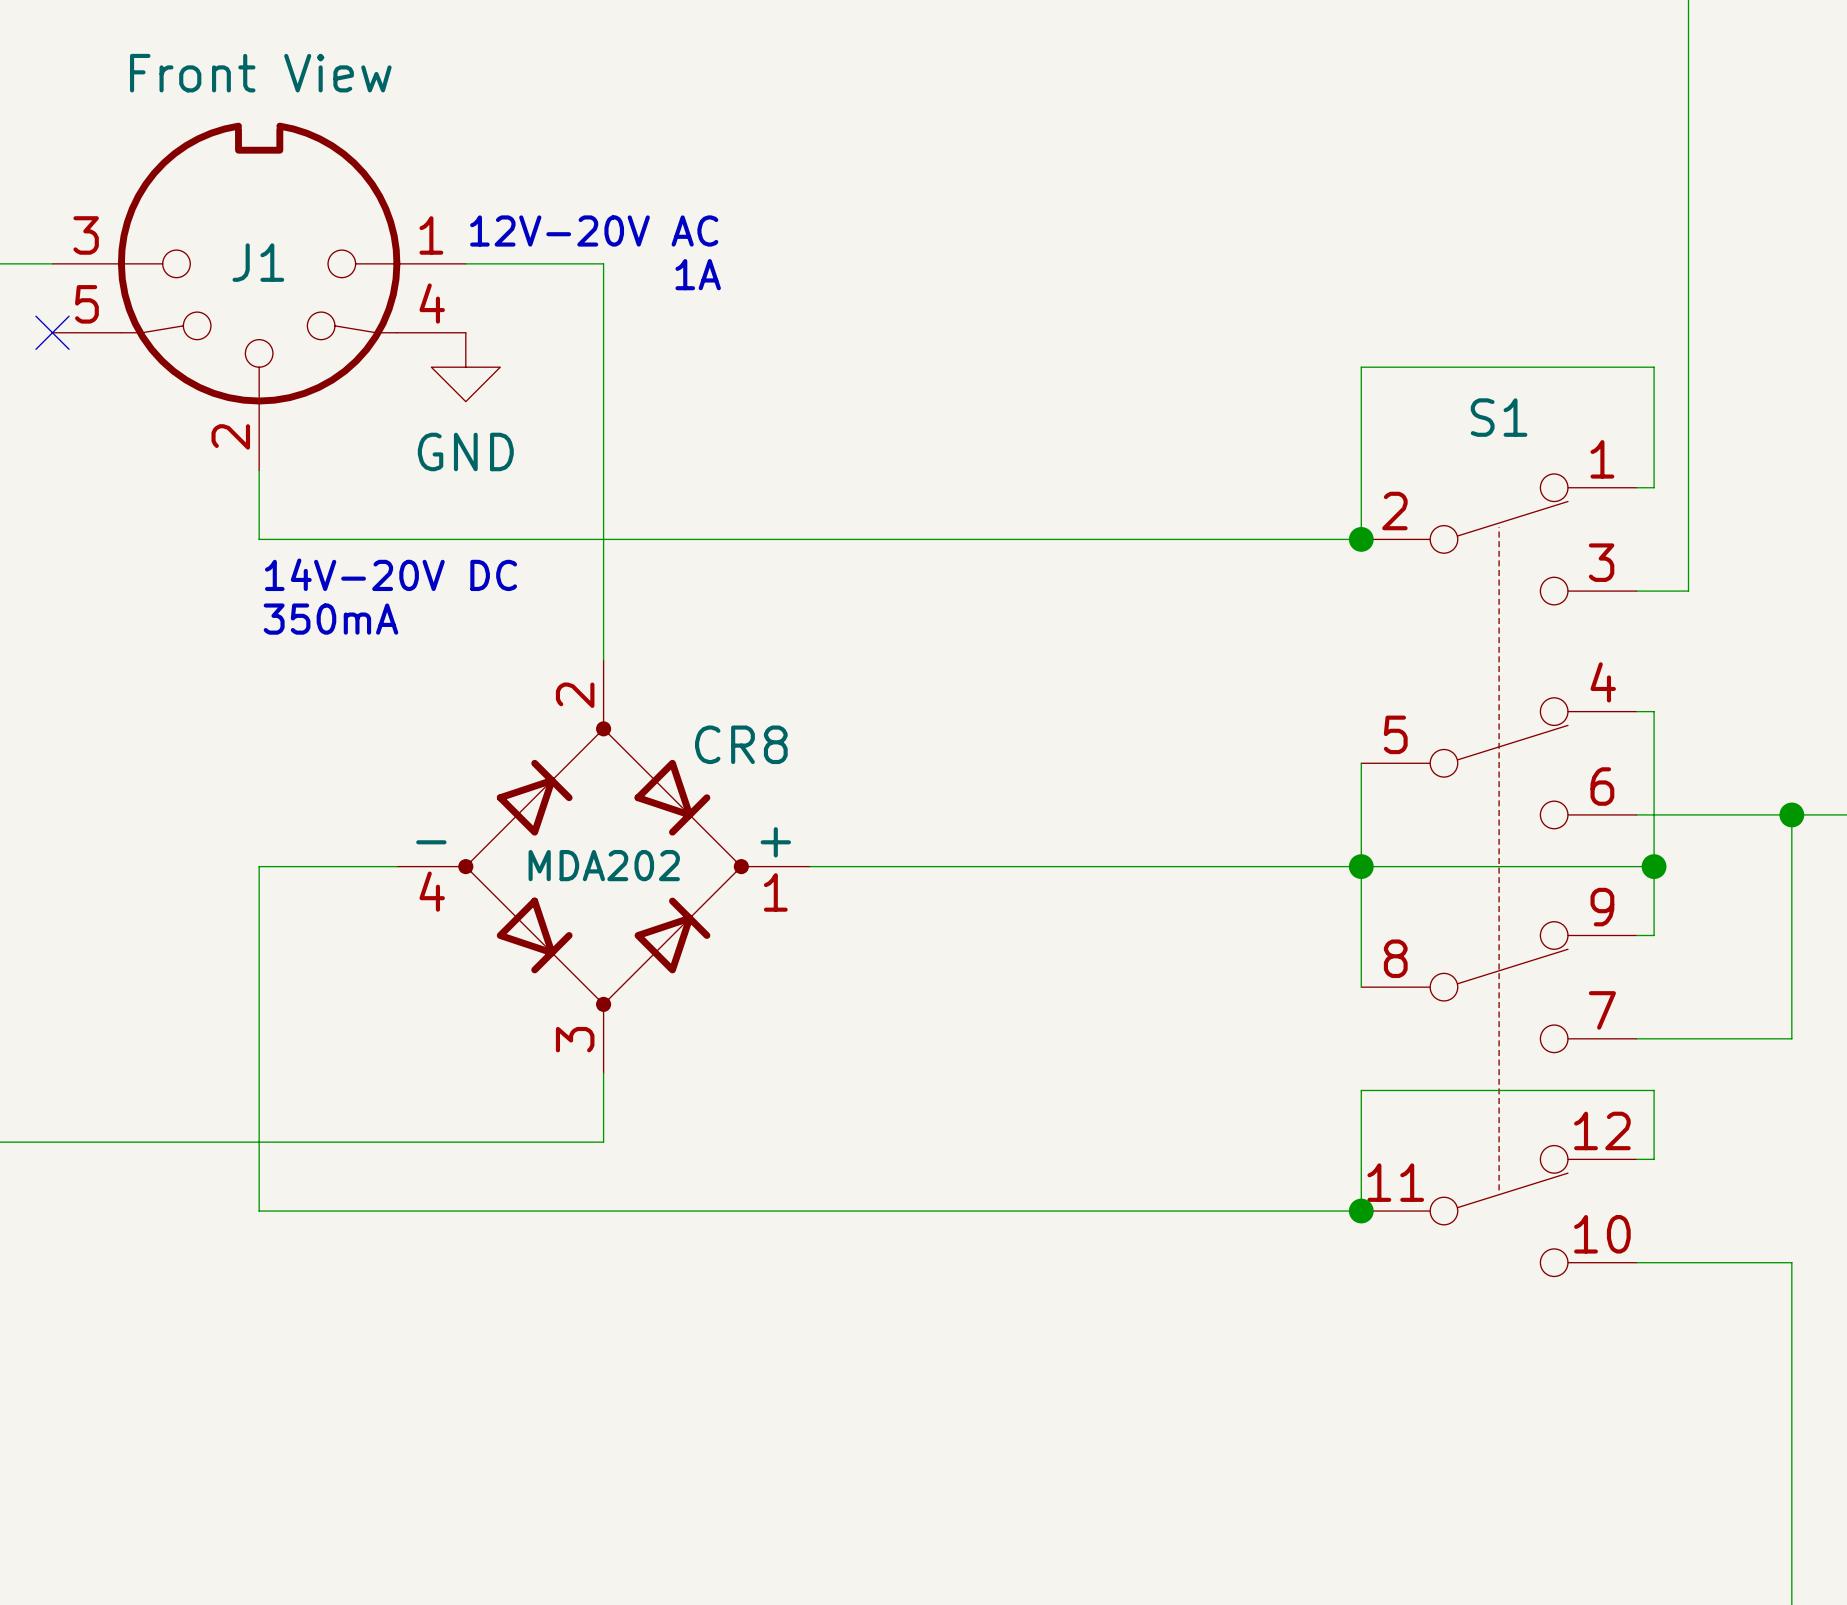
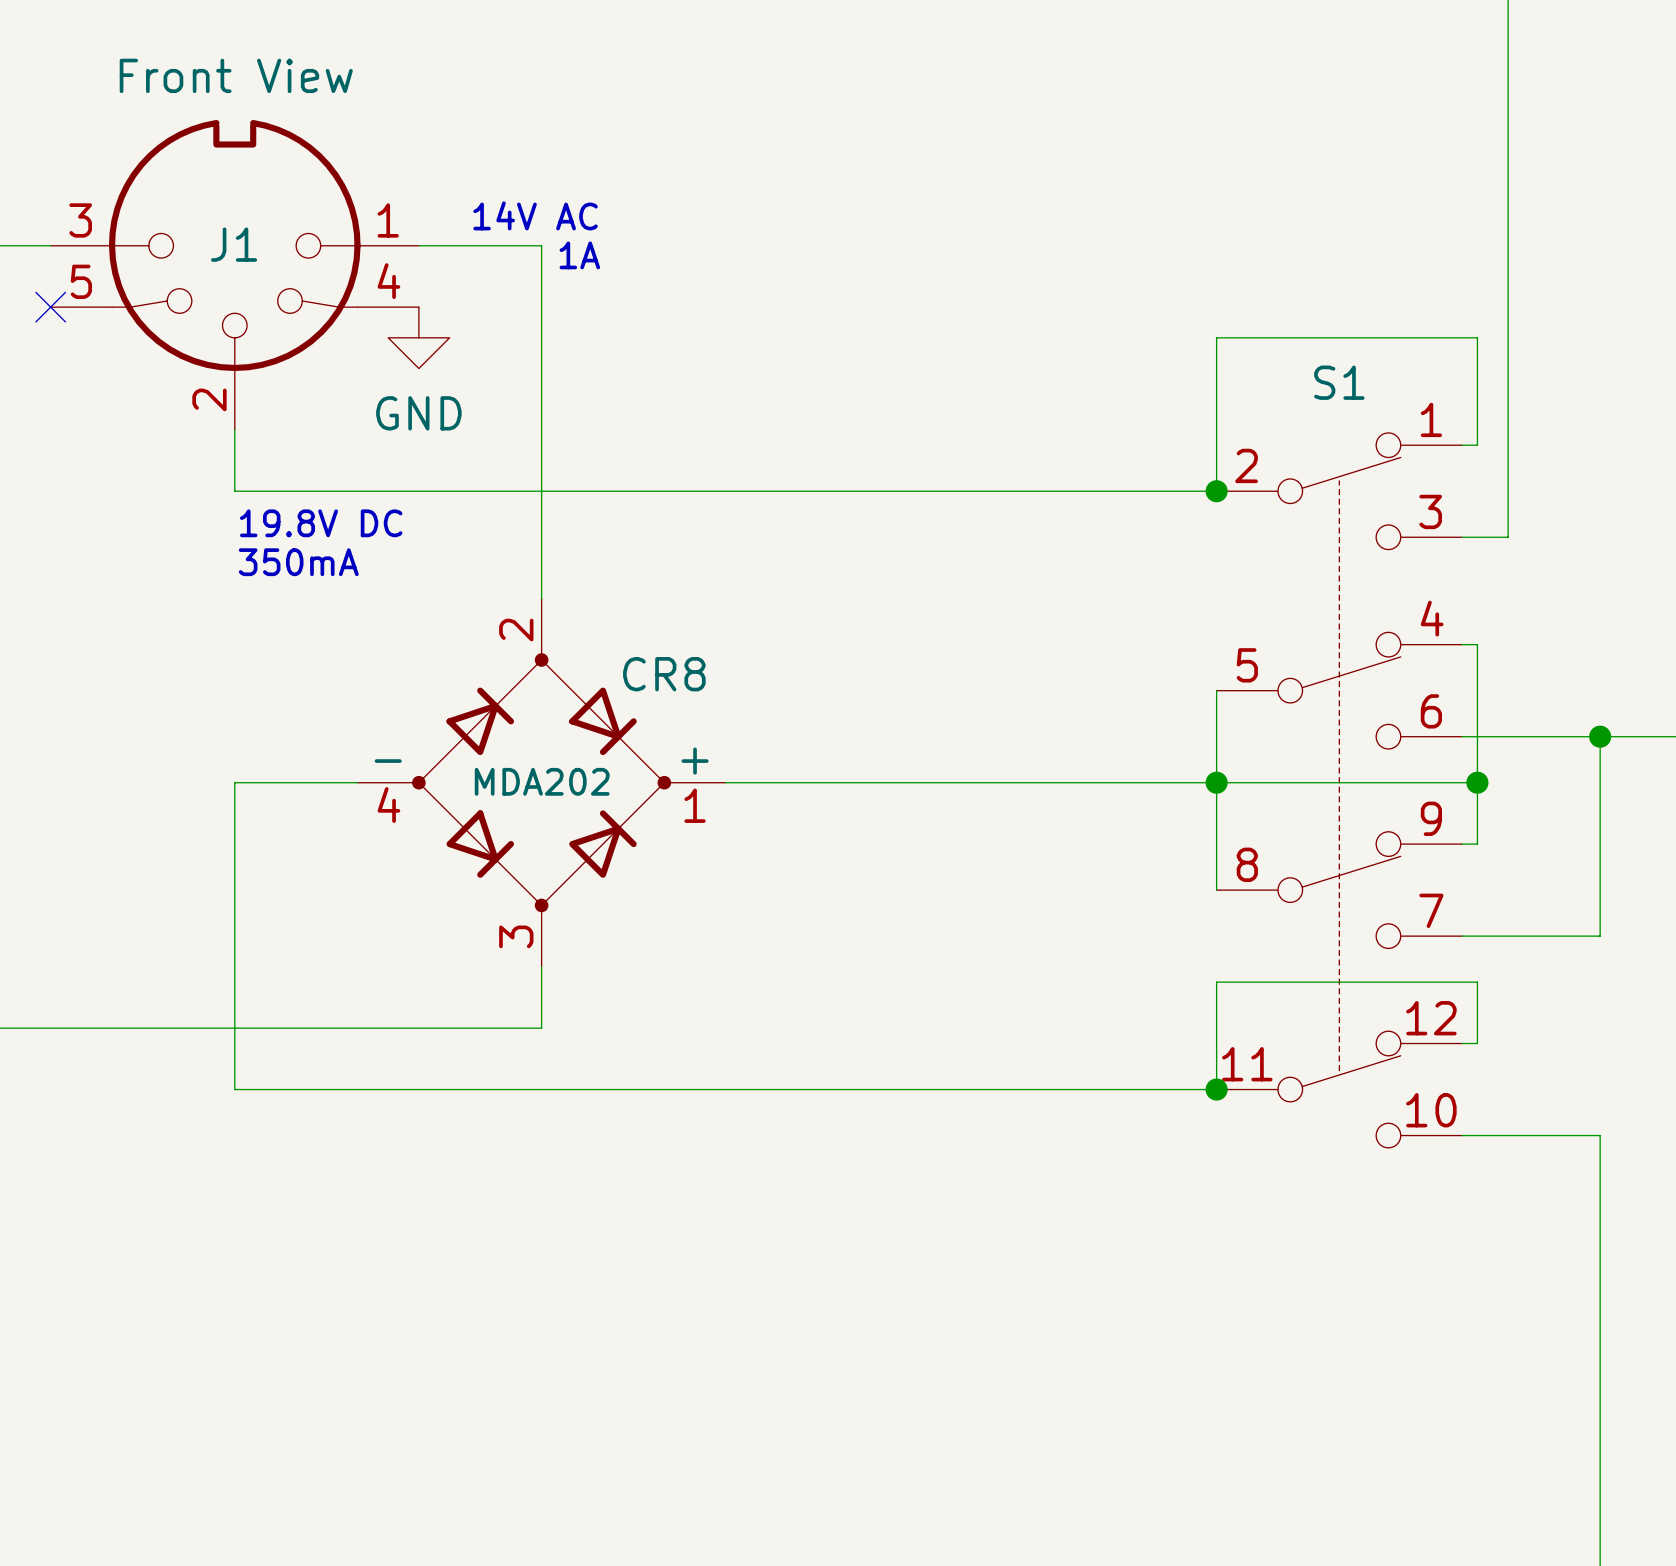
text: 12V-20V AC (594, 230) -> 14V AC (535, 215)
text position: 1A (698, 274) -> 1A (579, 255)
text: 14V-20V DC (391, 574) -> 19.8V DC (321, 523)

